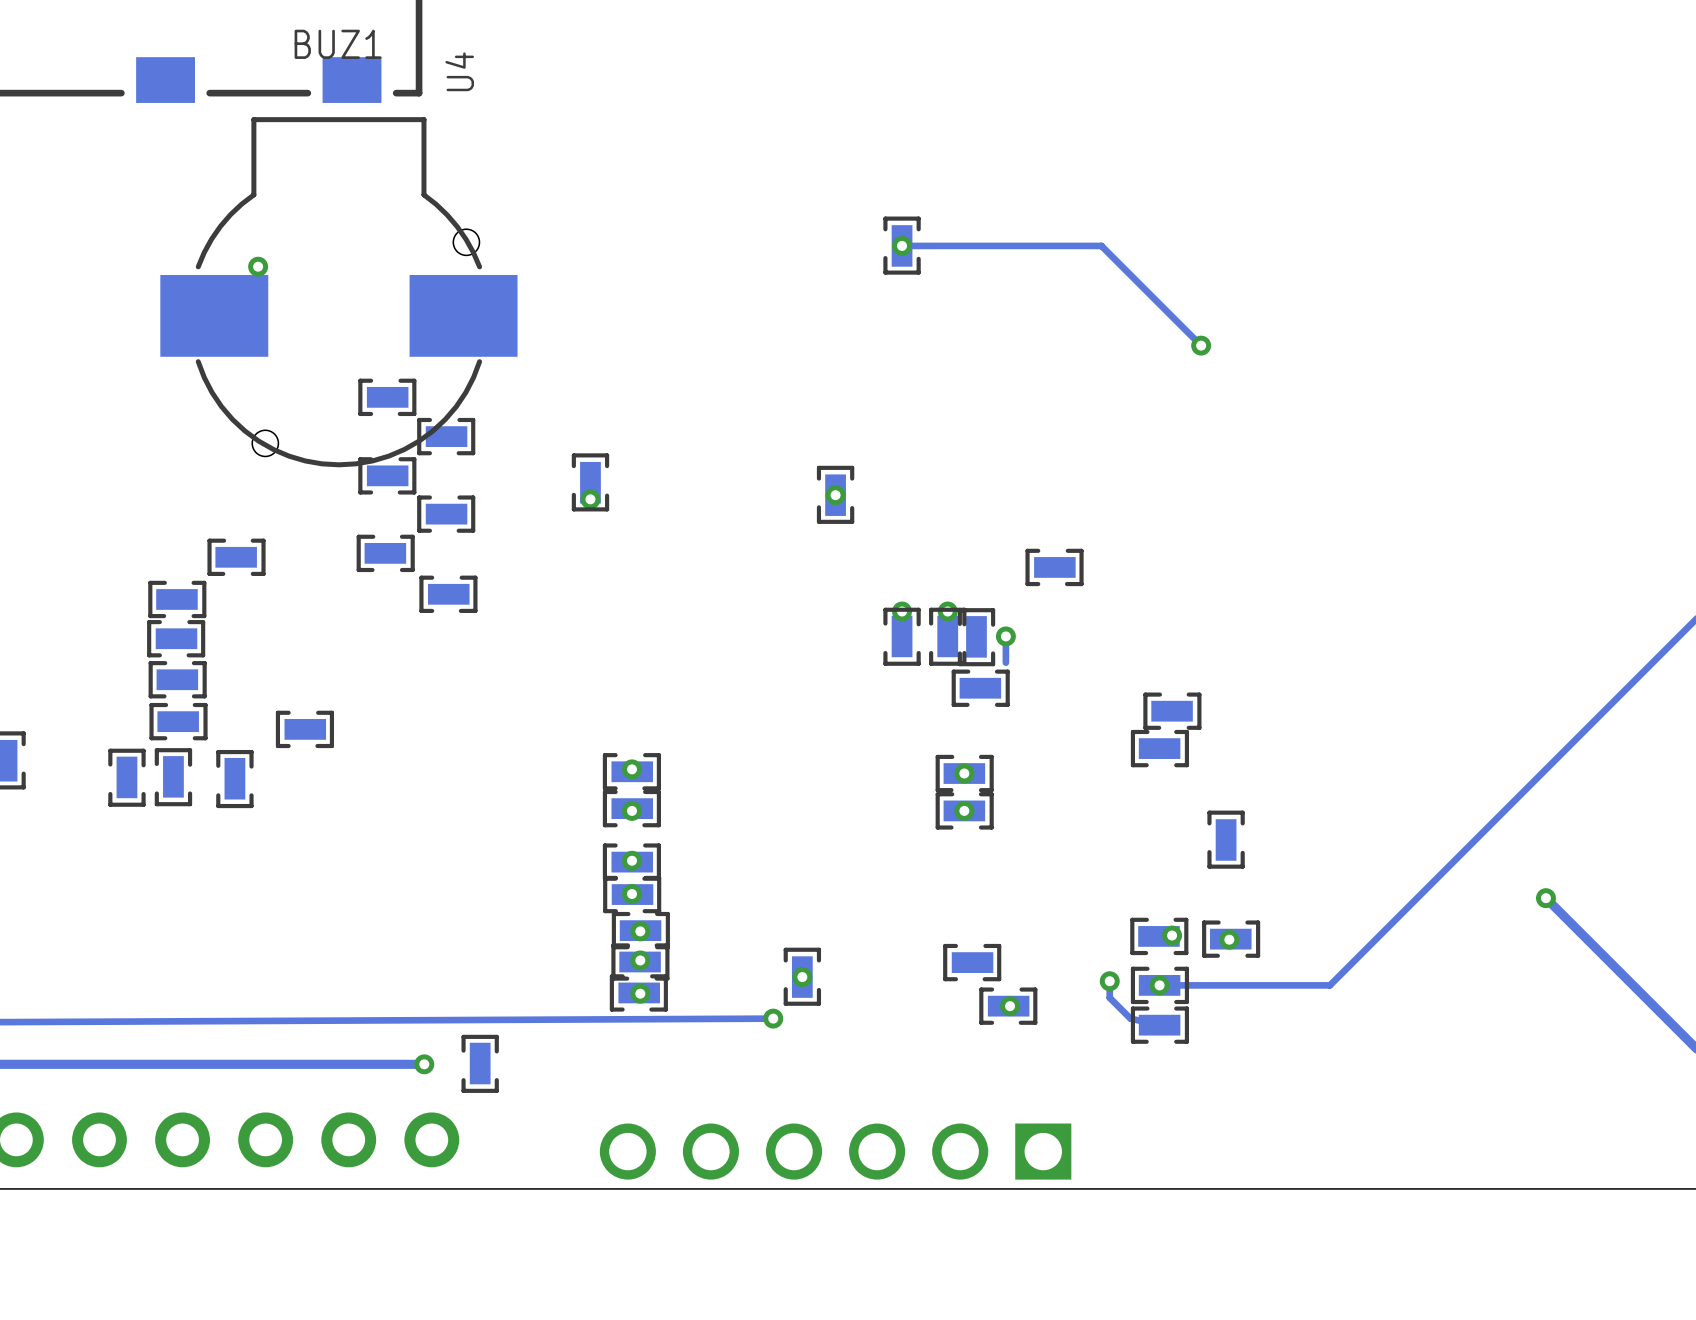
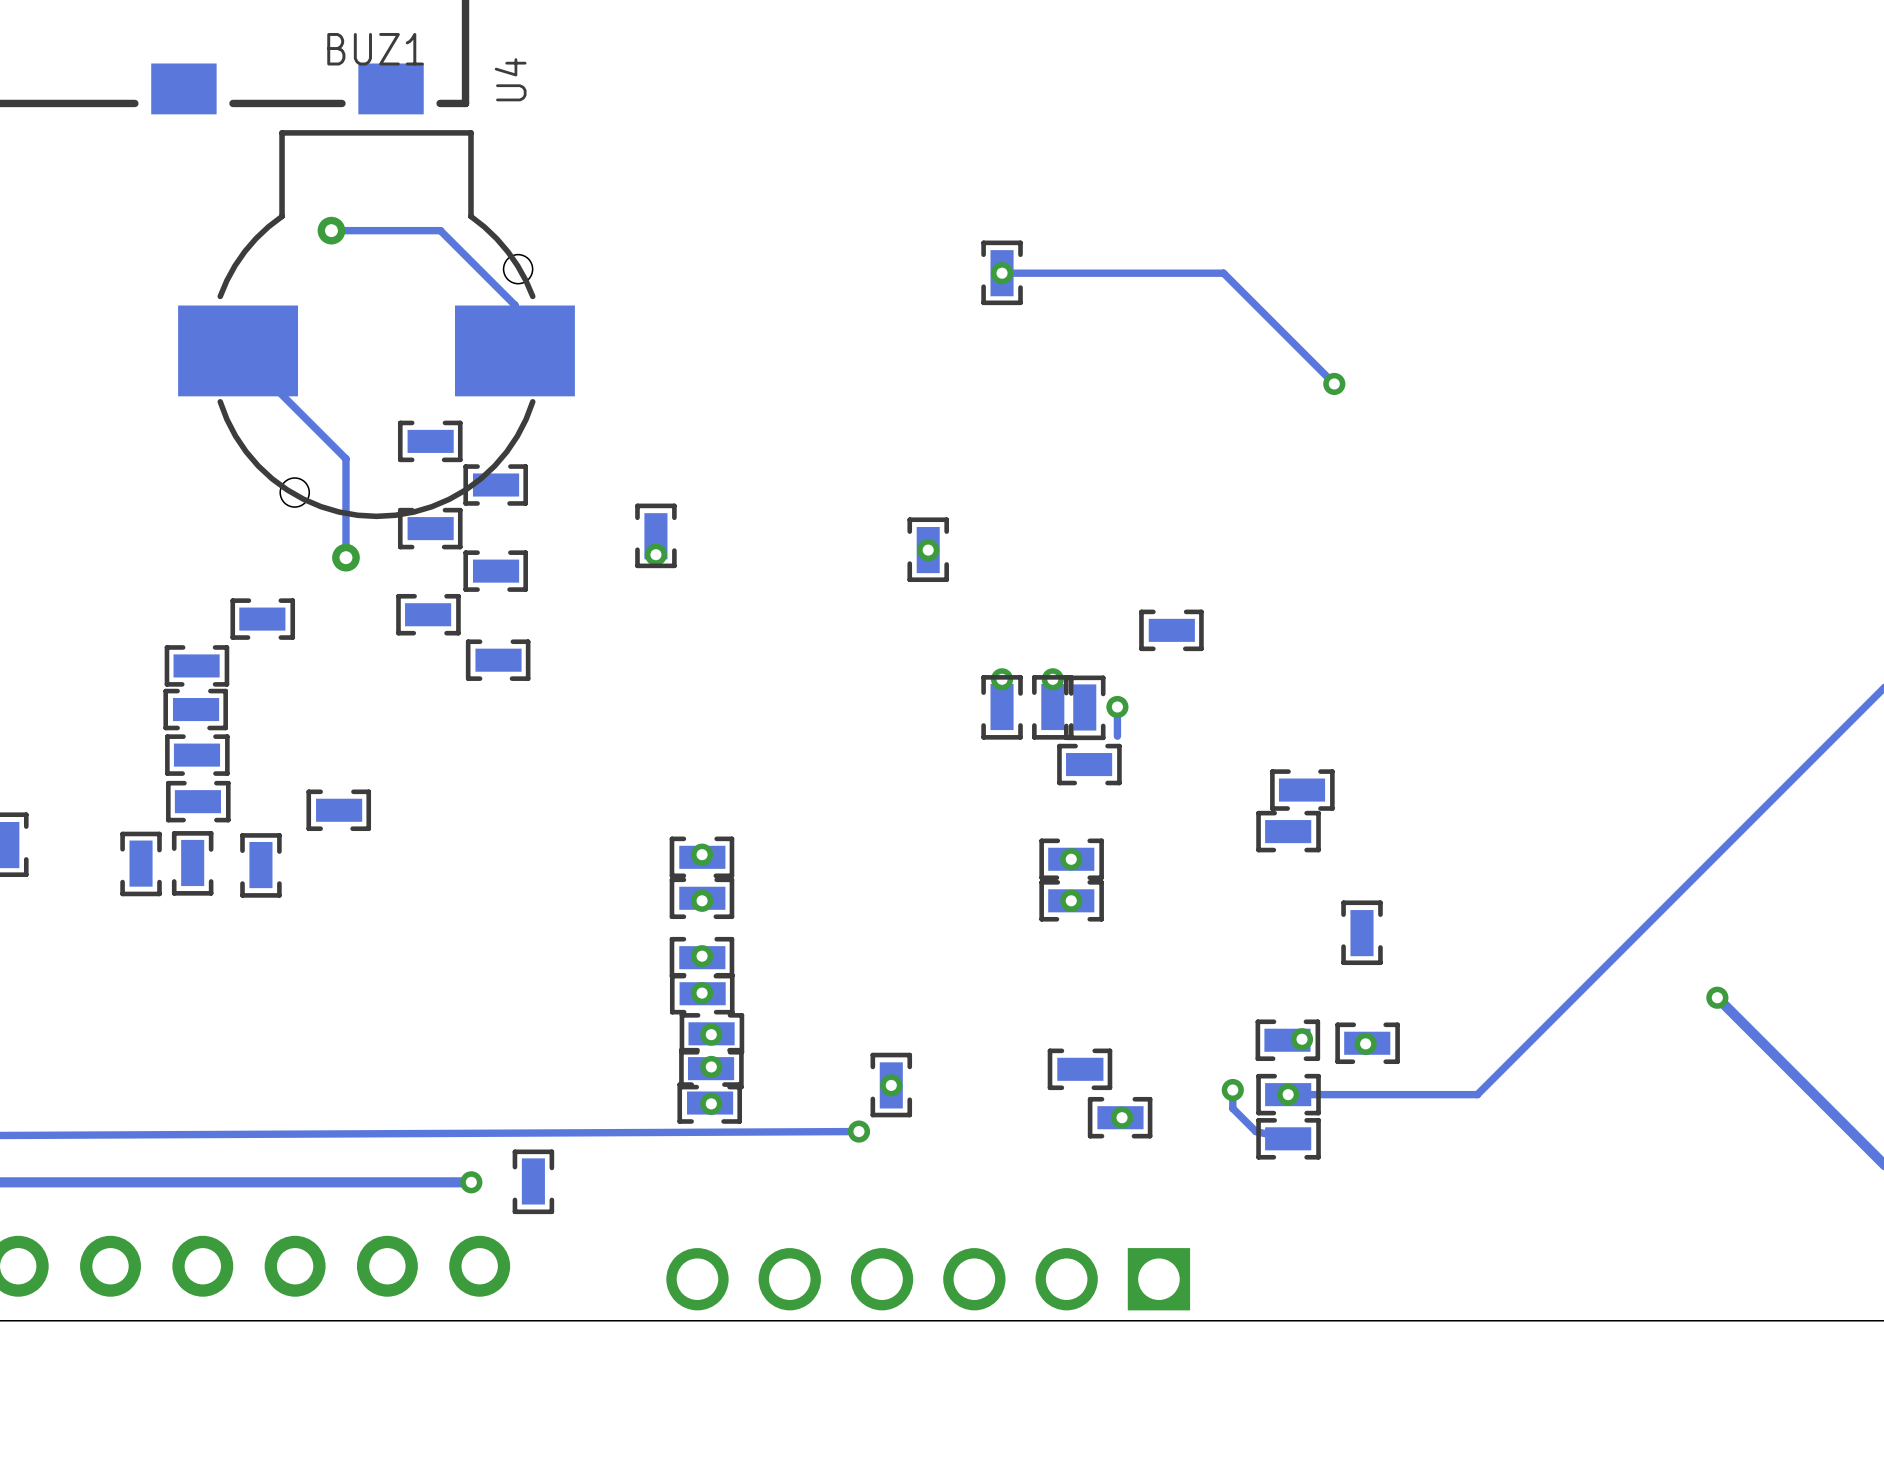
track: none -> (331, 230) (440, 230) (514, 305) (514, 350)
via: none -> (331, 230)
via: (258, 266) -> none
track: none -> (238, 350) (345, 458) (345, 557)
via: none -> (345, 557)

